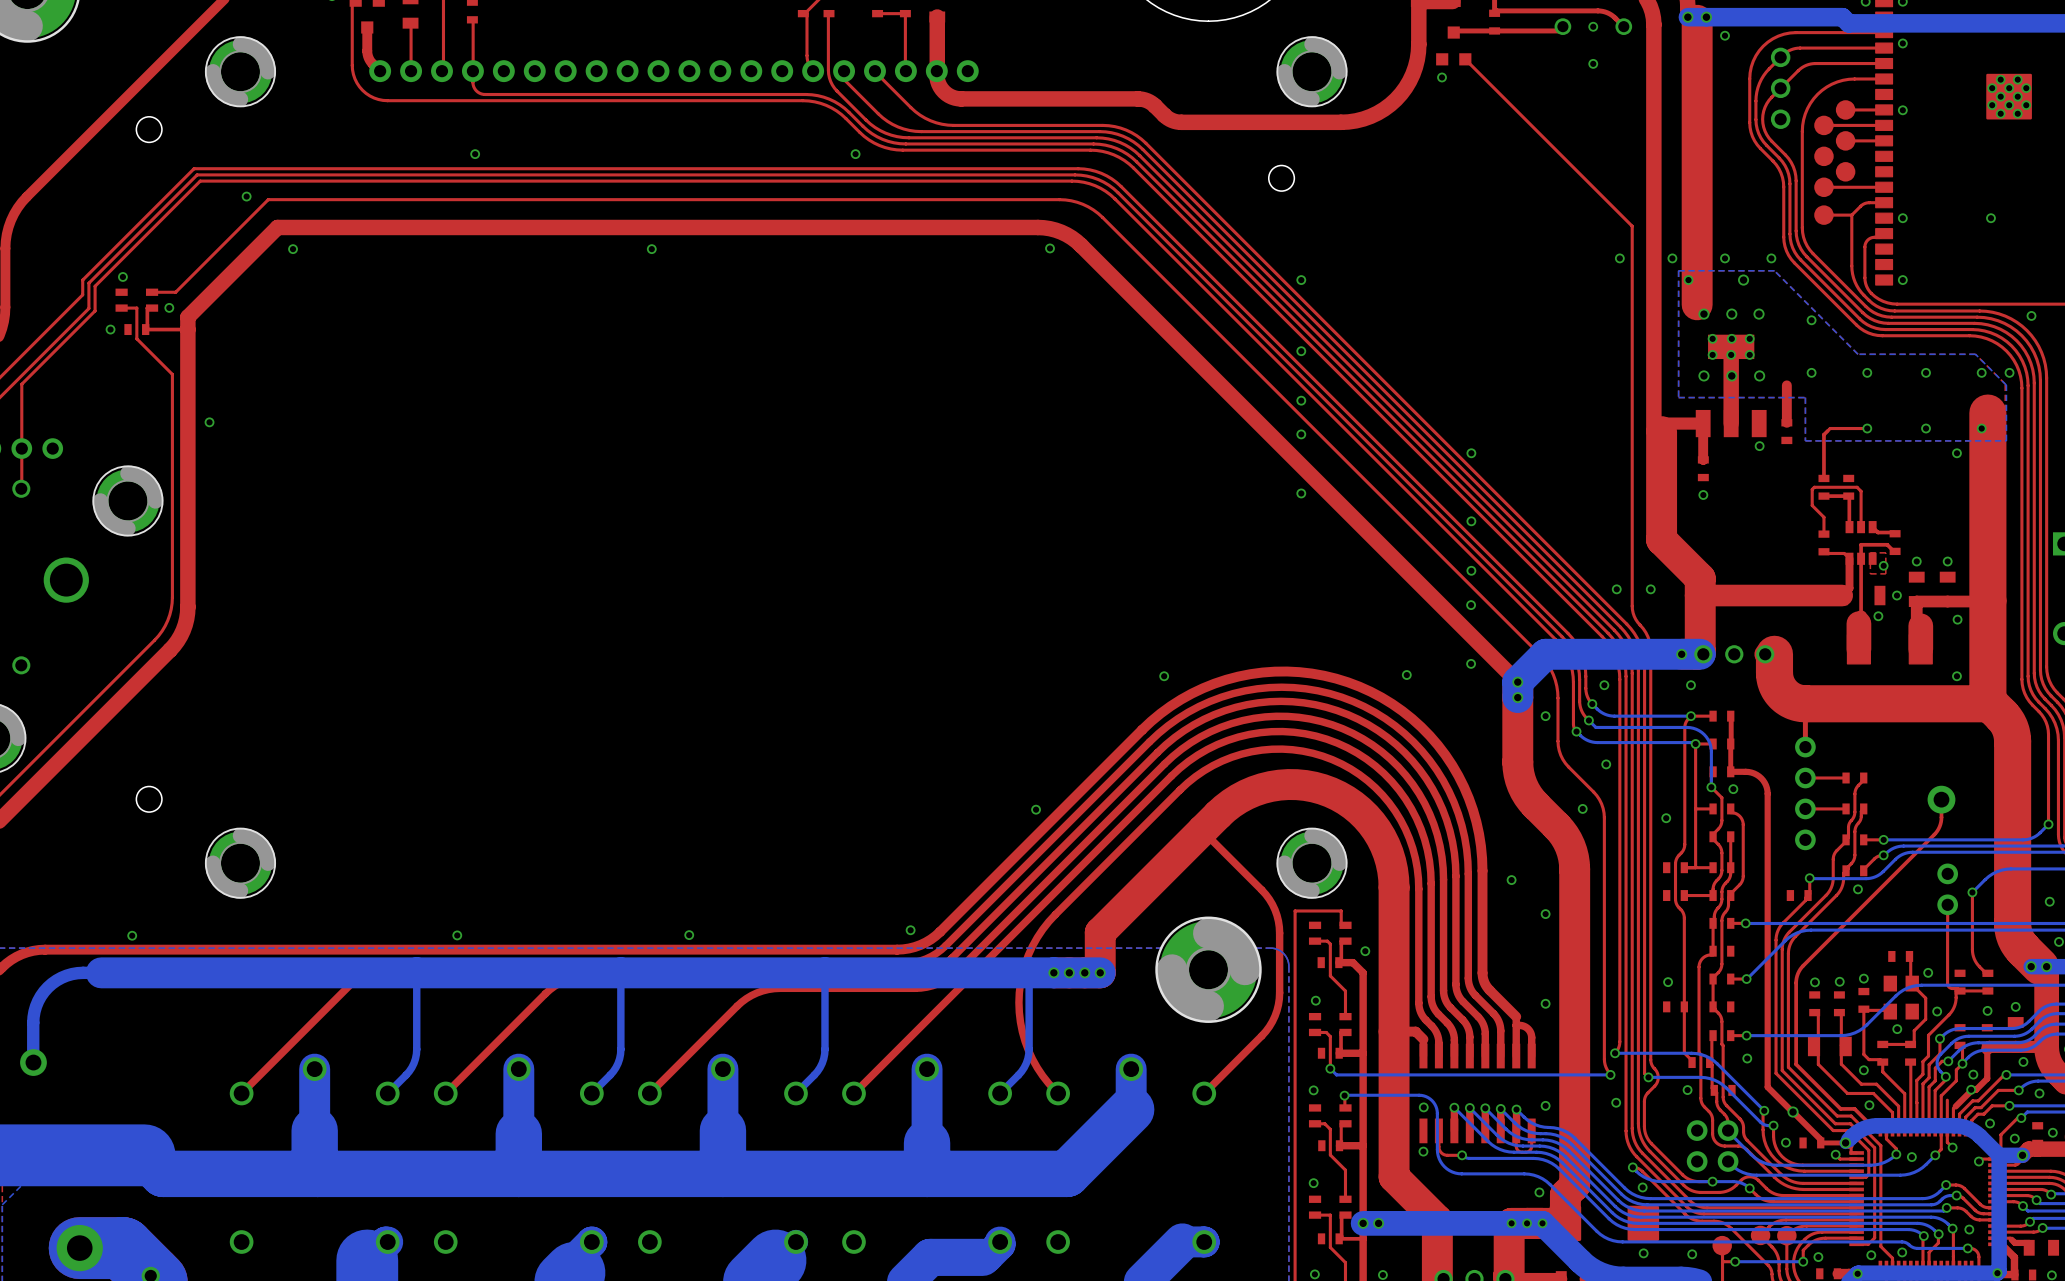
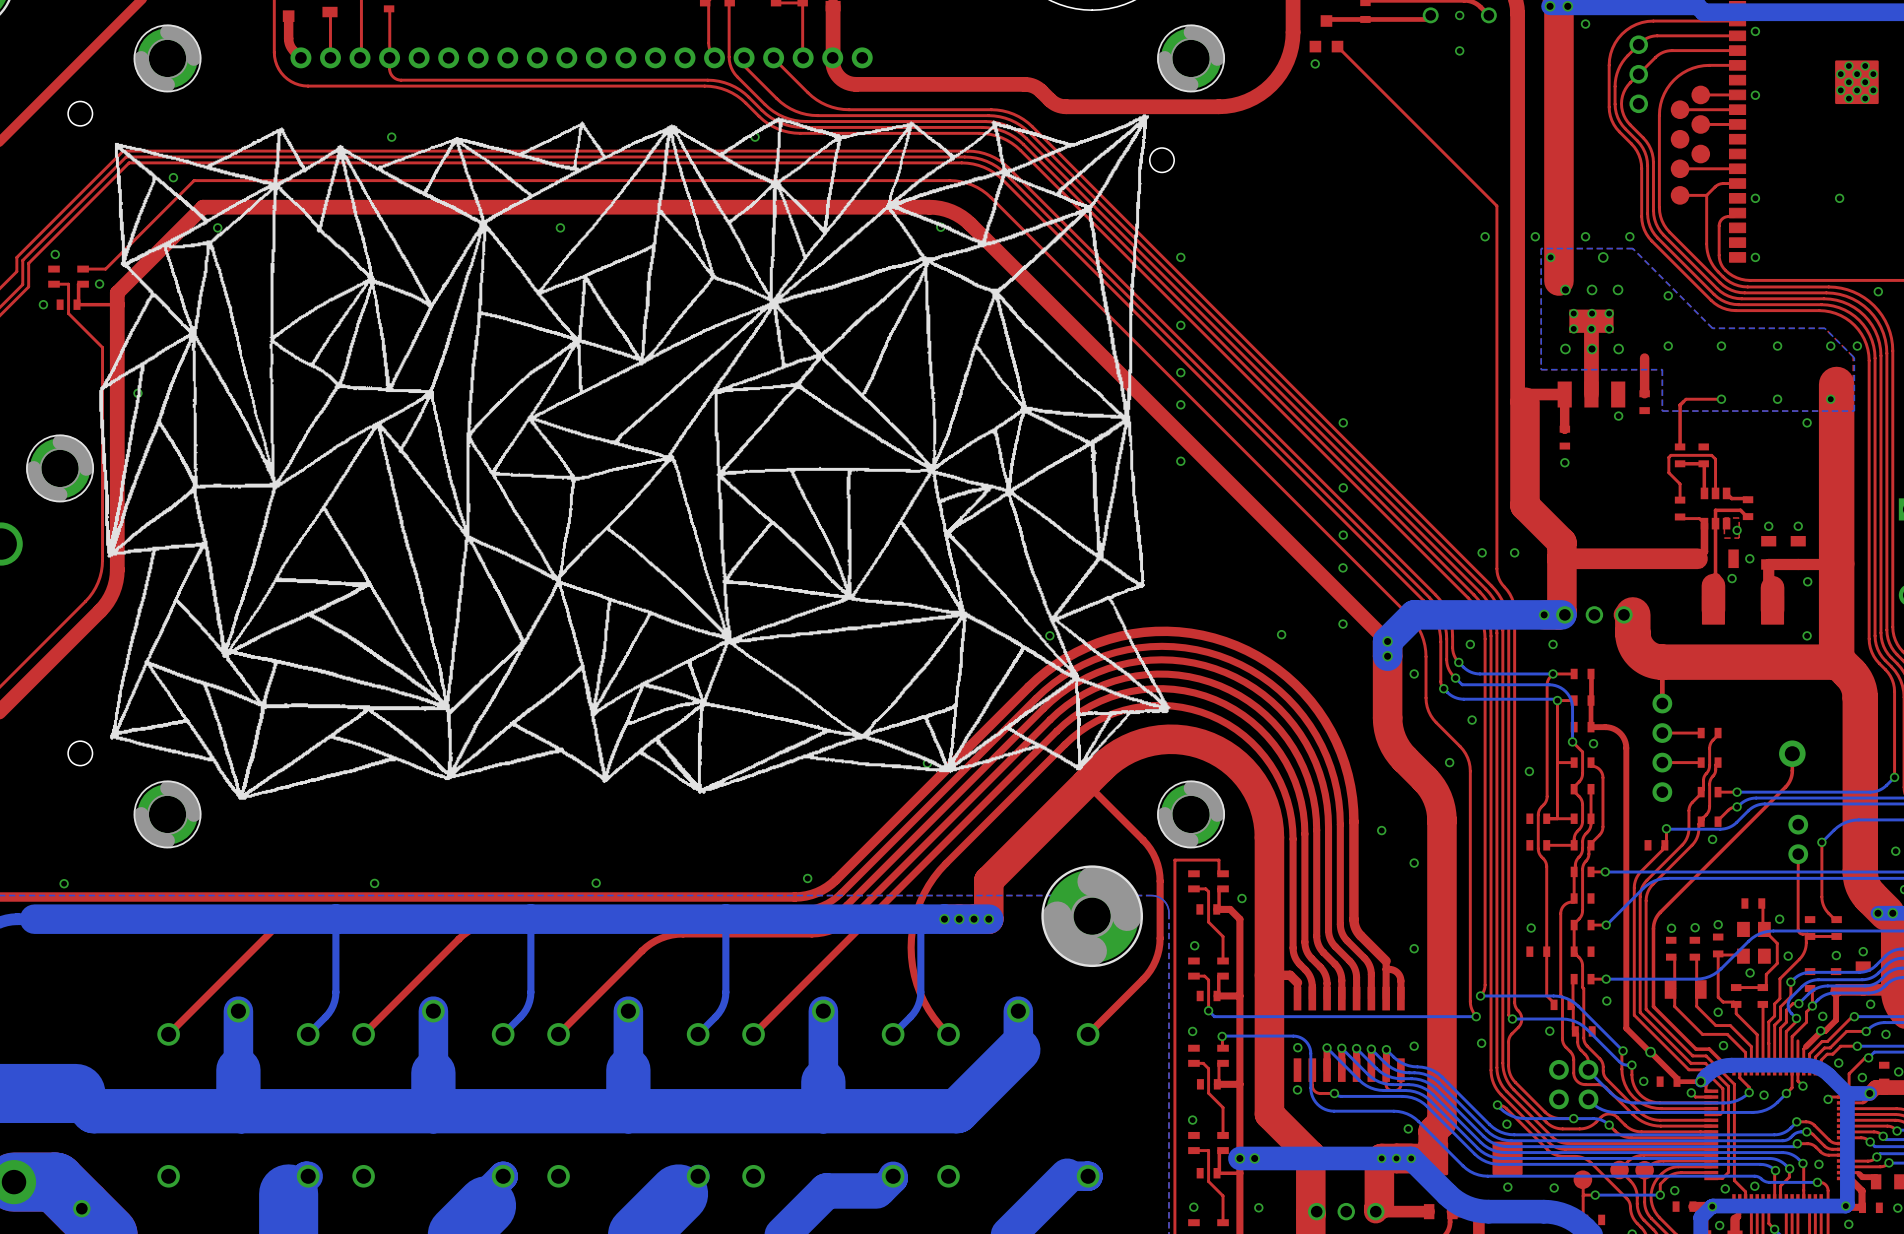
drawing: none -> [99, 114, 1171, 800]

